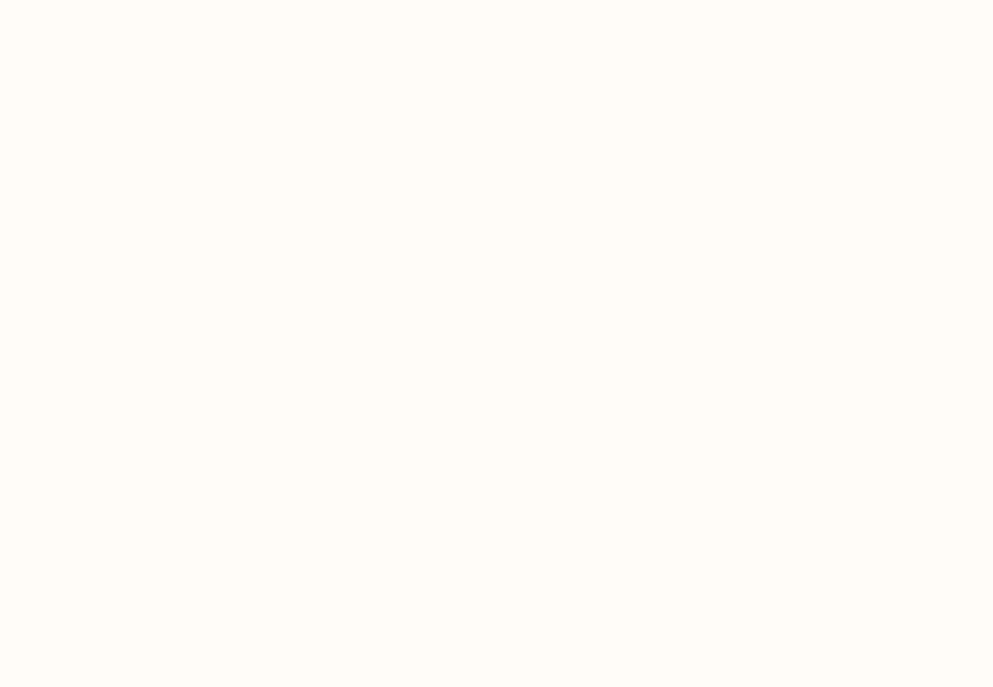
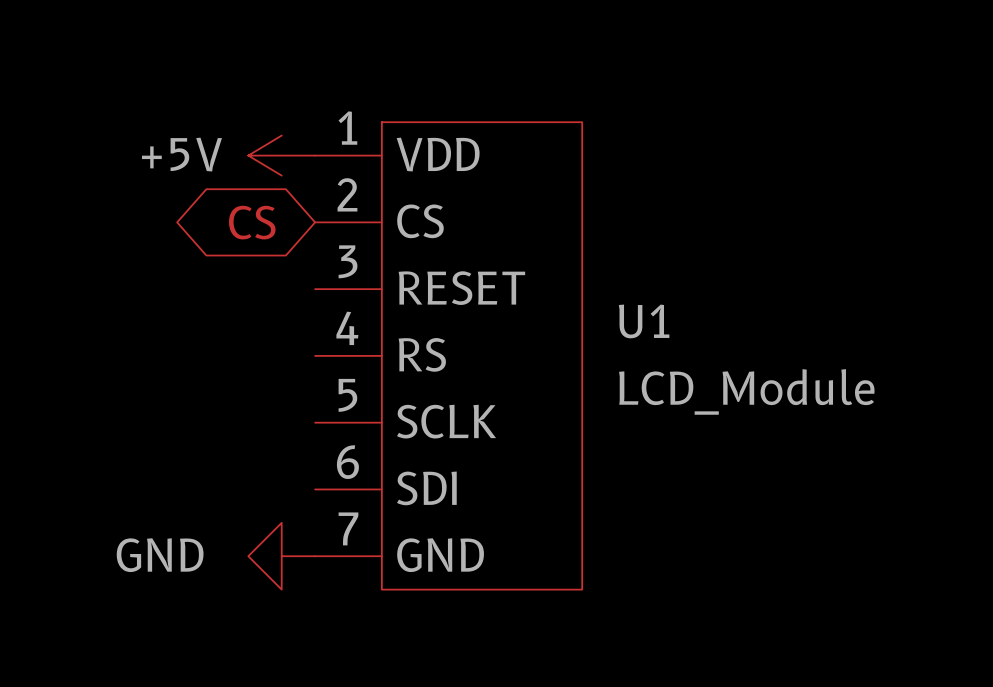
power symbol: none -> +5V (281, 155)
global label: none -> CS (252, 222)
U1: none -> LCD_Module (448, 355)
power symbol: none -> GND (281, 556)

